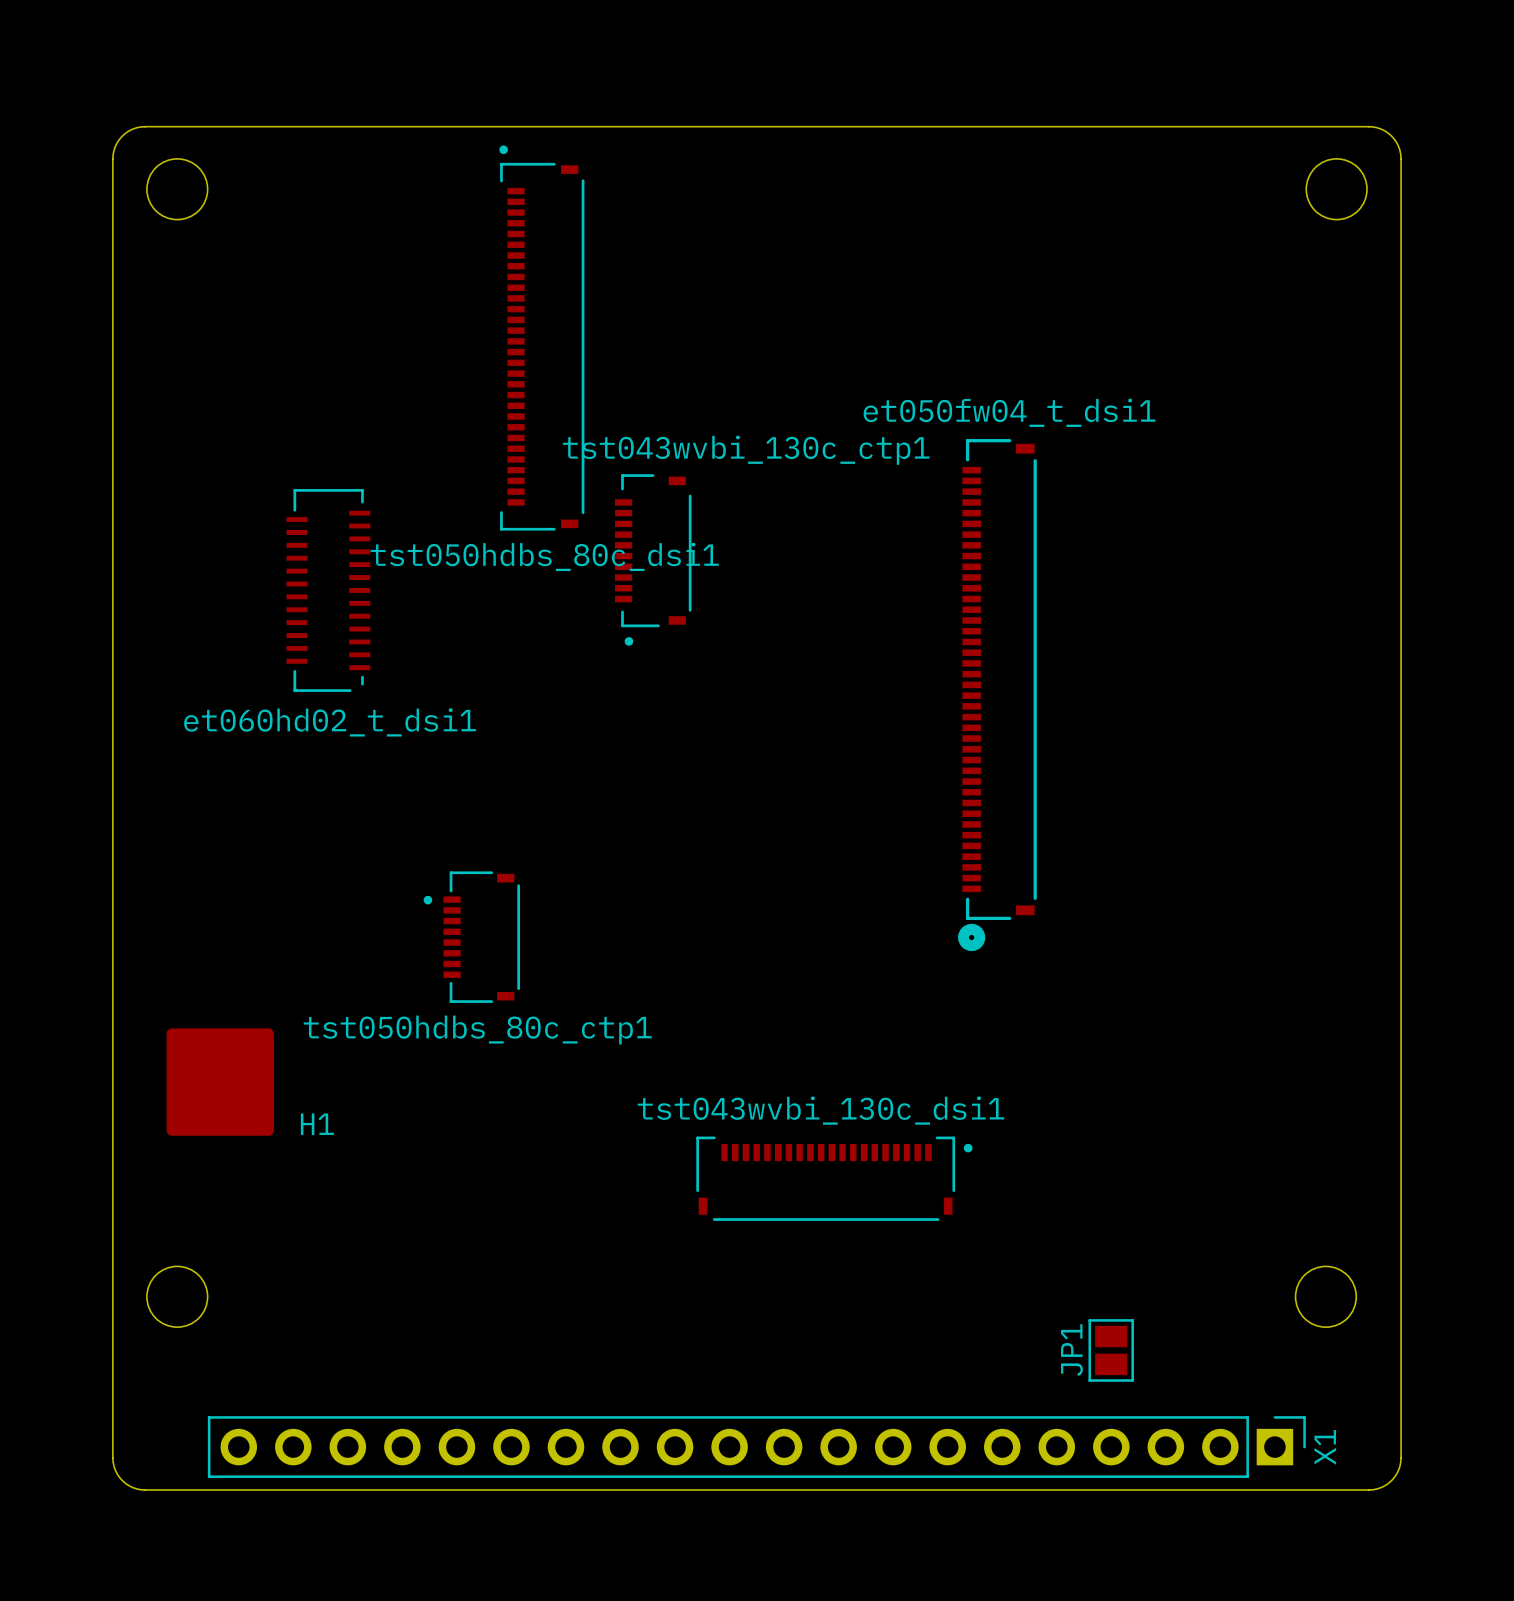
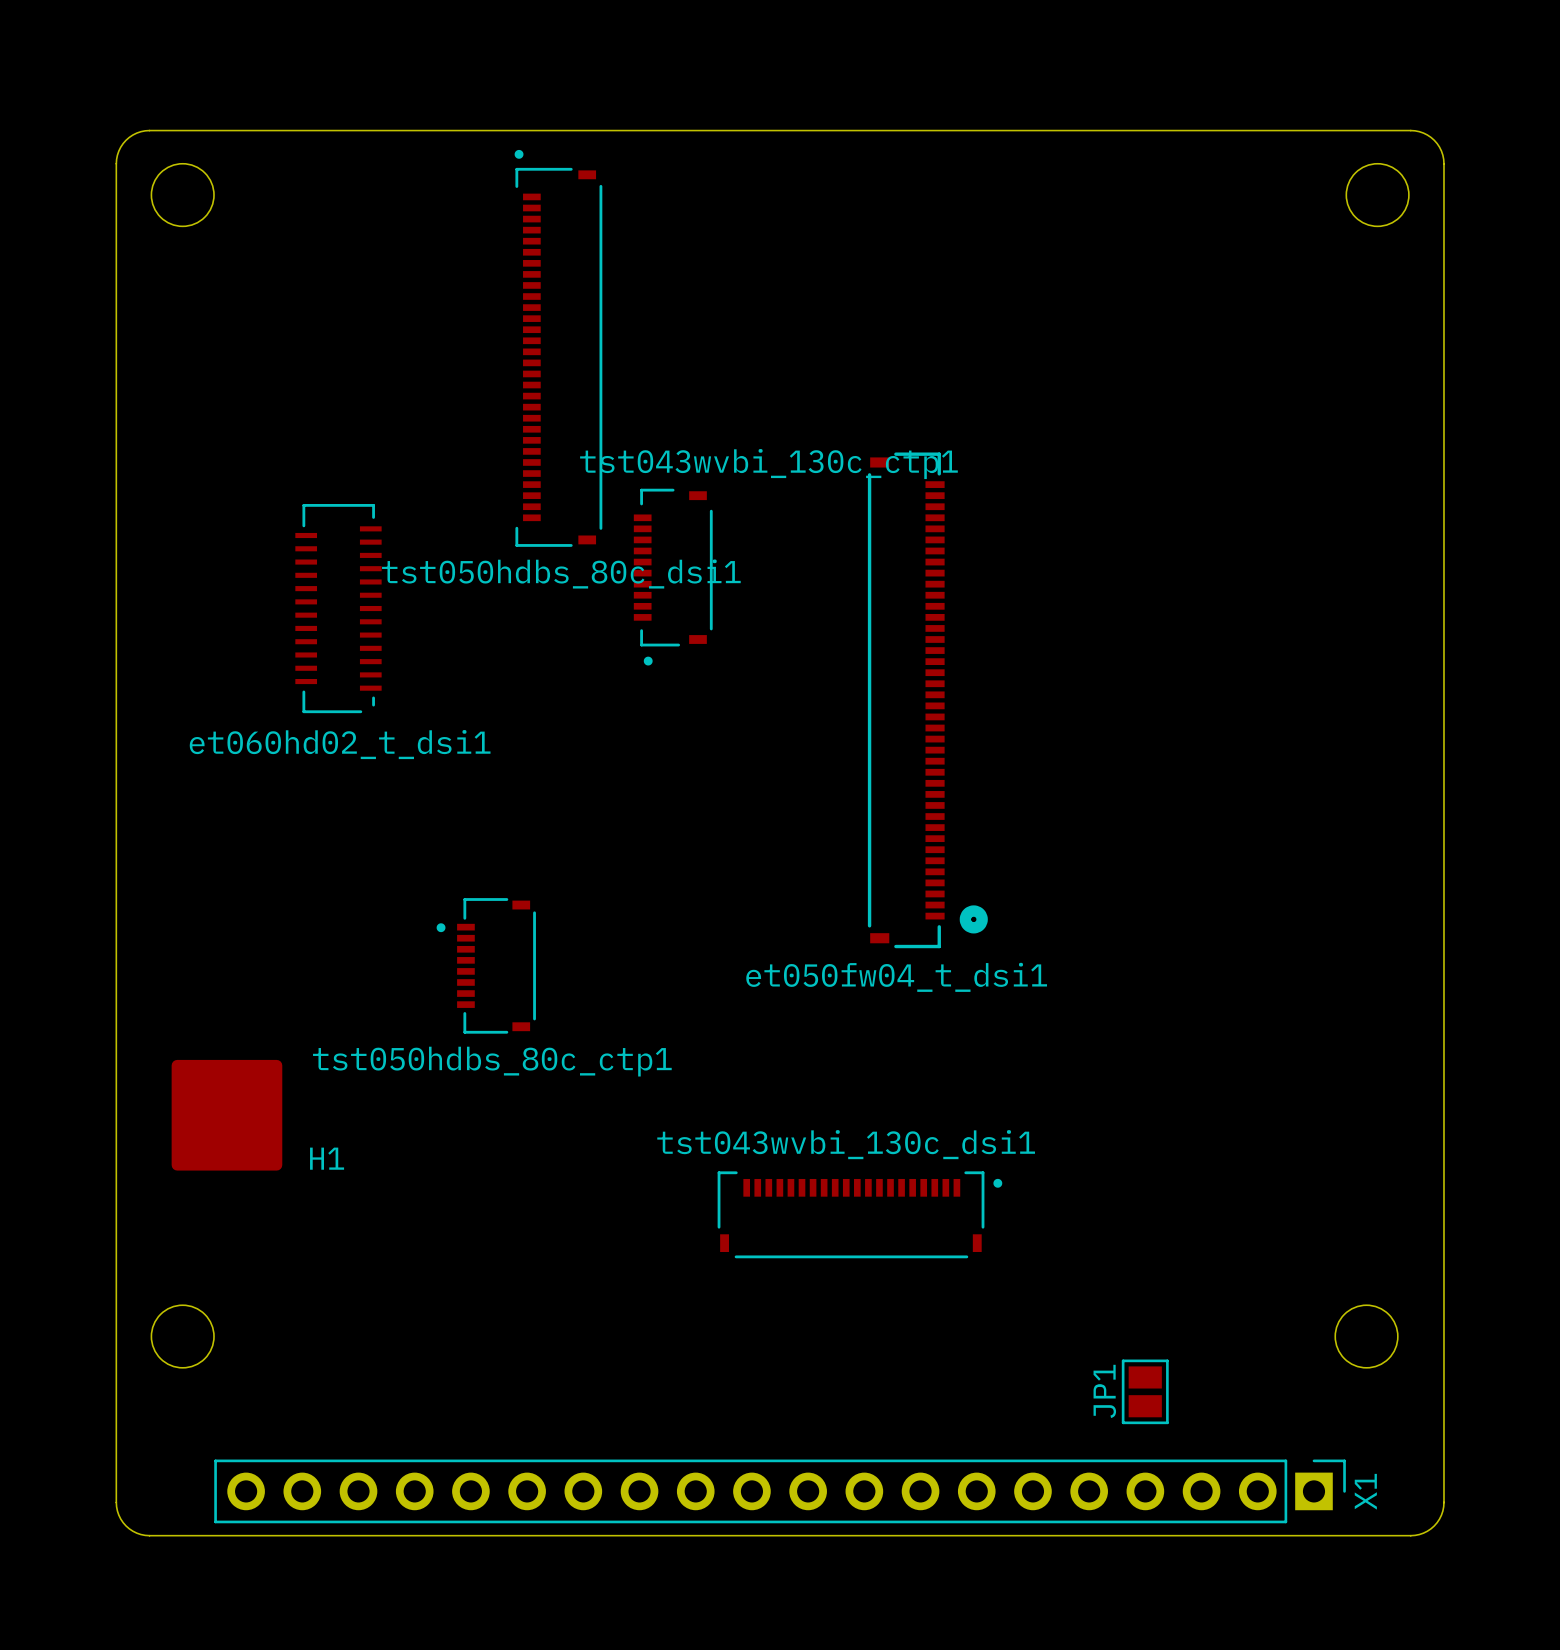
et050fw04_t_dsi1 name position: et050fw04_t_dsi1 (1009, 412) -> et050fw04_t_dsi1 (896, 977)
et050fw04_t_dsi1 footprint: [958, 439, 1037, 952] -> [867, 452, 988, 949]

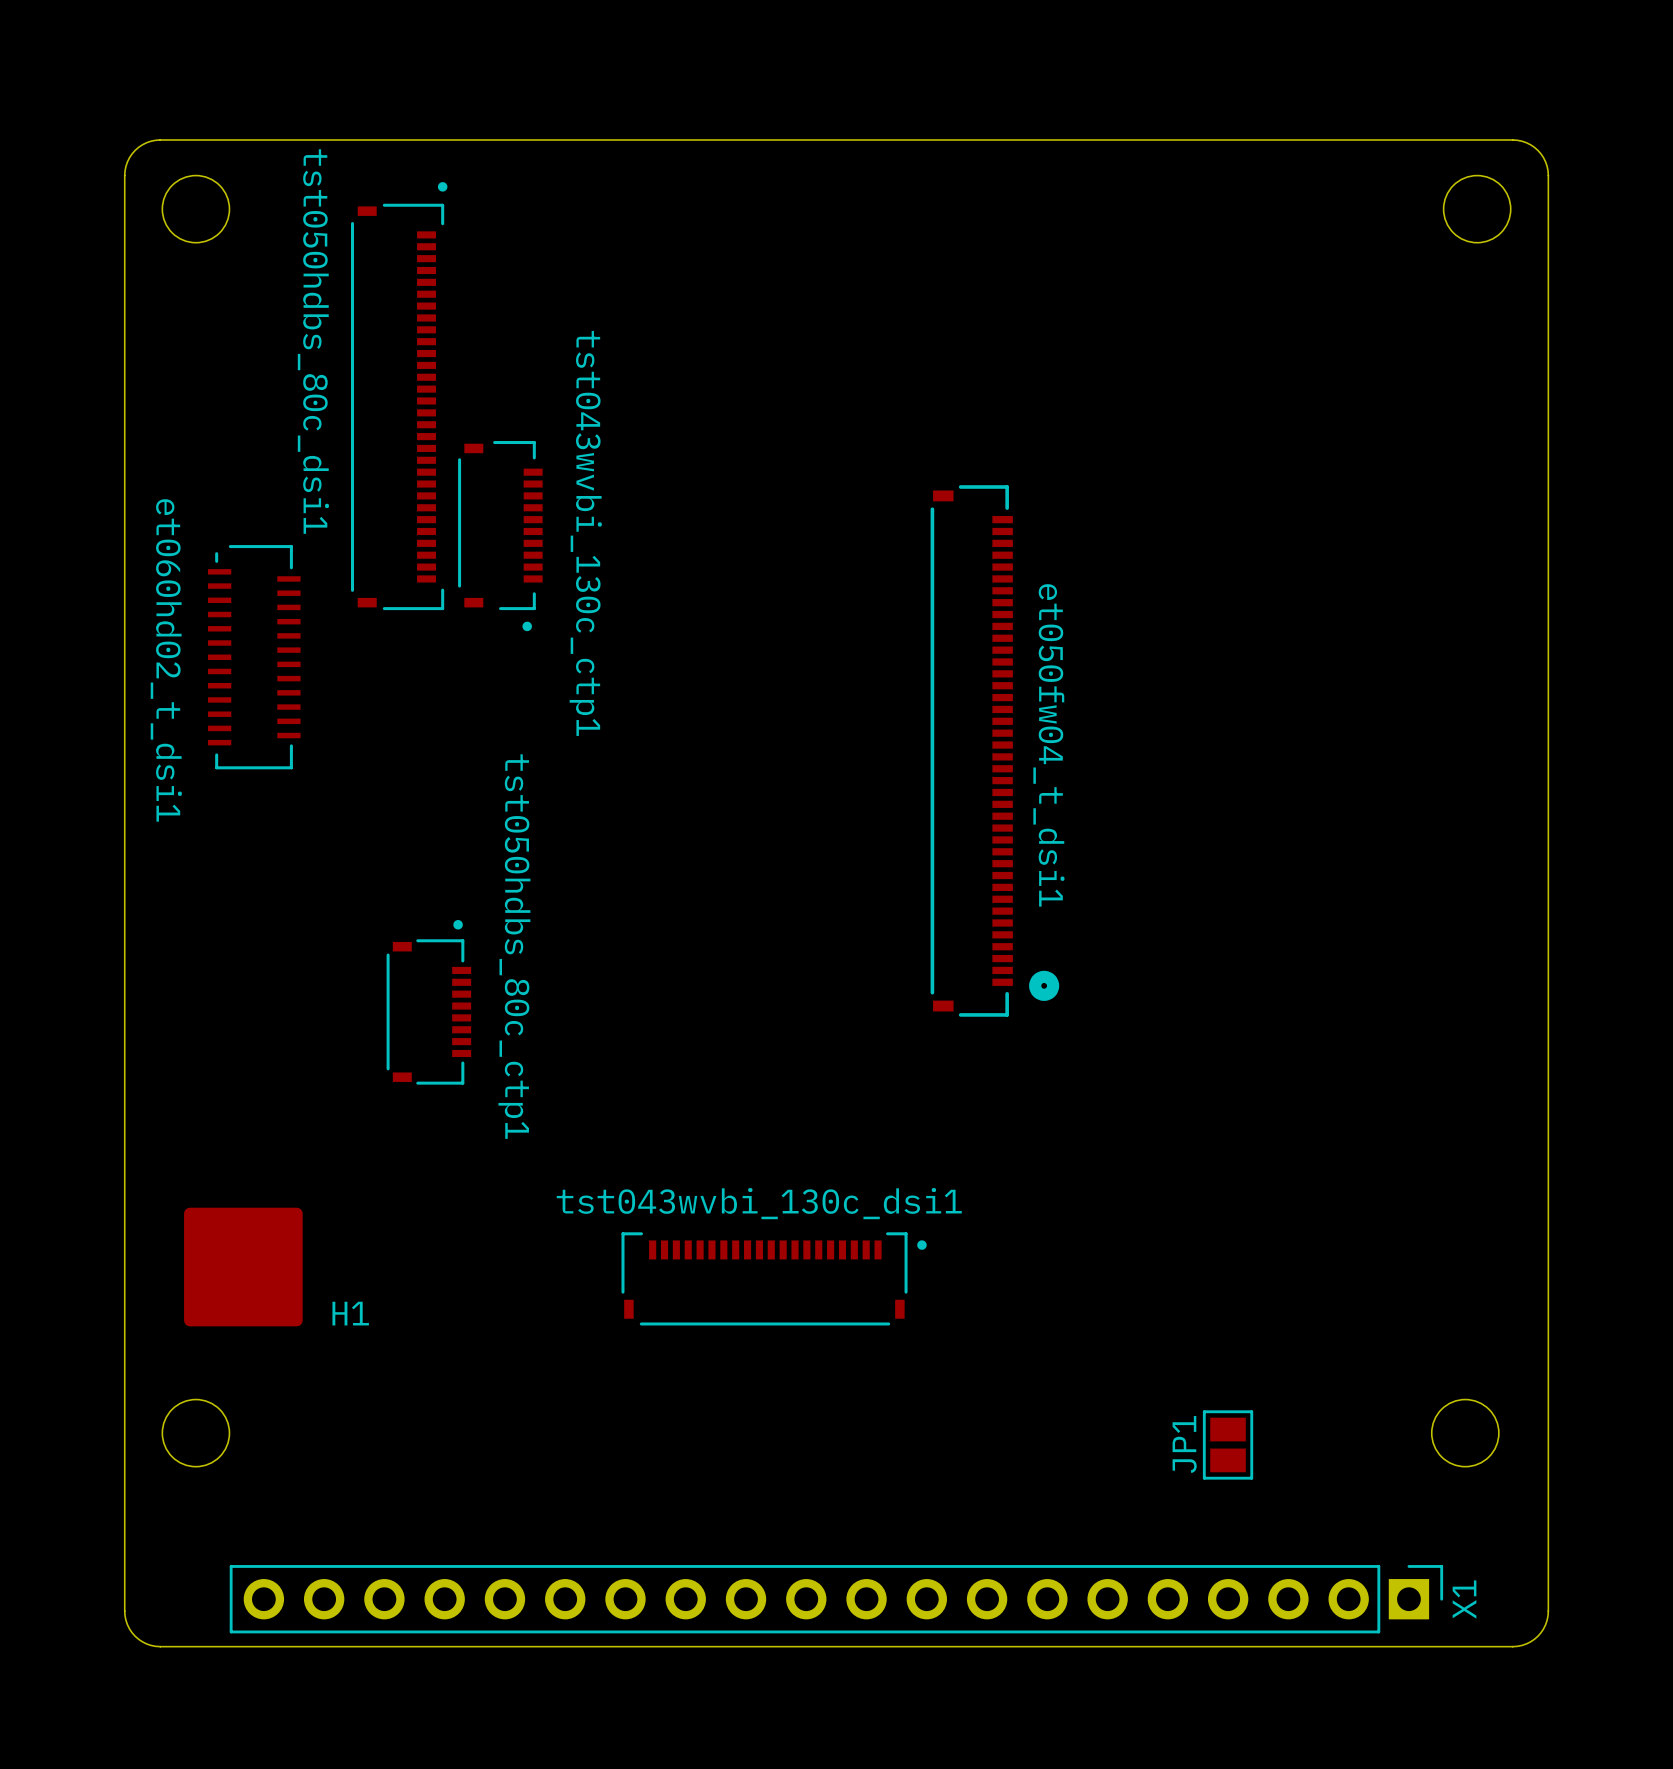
tst050hdbs_80c_dsi1 footprint: [514, 149, 603, 547] -> [351, 182, 448, 611]
tst043wvbi_130c_ctp1 name position: tst043wvbi_130c_ctp1 (768, 464) -> tst043wvbi_130c_ctp1 (585, 533)
tst043wvbi_130c_ctp1 footprint: [633, 488, 713, 666] -> [458, 441, 543, 632]
et060hd02_t_dsi1 footprint: [295, 494, 382, 714] -> [208, 532, 301, 770]
tst050hdbs_80c_dsi1 name position: tst050hdbs_80c_dsi1 (561, 574) -> tst050hdbs_80c_dsi1 (313, 341)
et060hd02_t_dsi1 name position: et060hd02_t_dsi1 (340, 744) -> et060hd02_t_dsi1 (166, 660)
tst050hdbs_80c_ctp1 footprint: [436, 898, 536, 1034] -> [386, 920, 472, 1085]
et050fw04_t_dsi1 name rotation: 0° (896, 977) -> 90° clockwise (1048, 745)
tst050hdbs_80c_ctp1 name position: tst050hdbs_80c_ctp1 (492, 1061) -> tst050hdbs_80c_ctp1 (514, 946)
H1 position: (226, 1115) -> (243, 1267)
tst043wvbi_130c_dsi1 position: (859, 1214) -> (774, 1278)
JP1 position: (1145, 1391) -> (1228, 1444)

